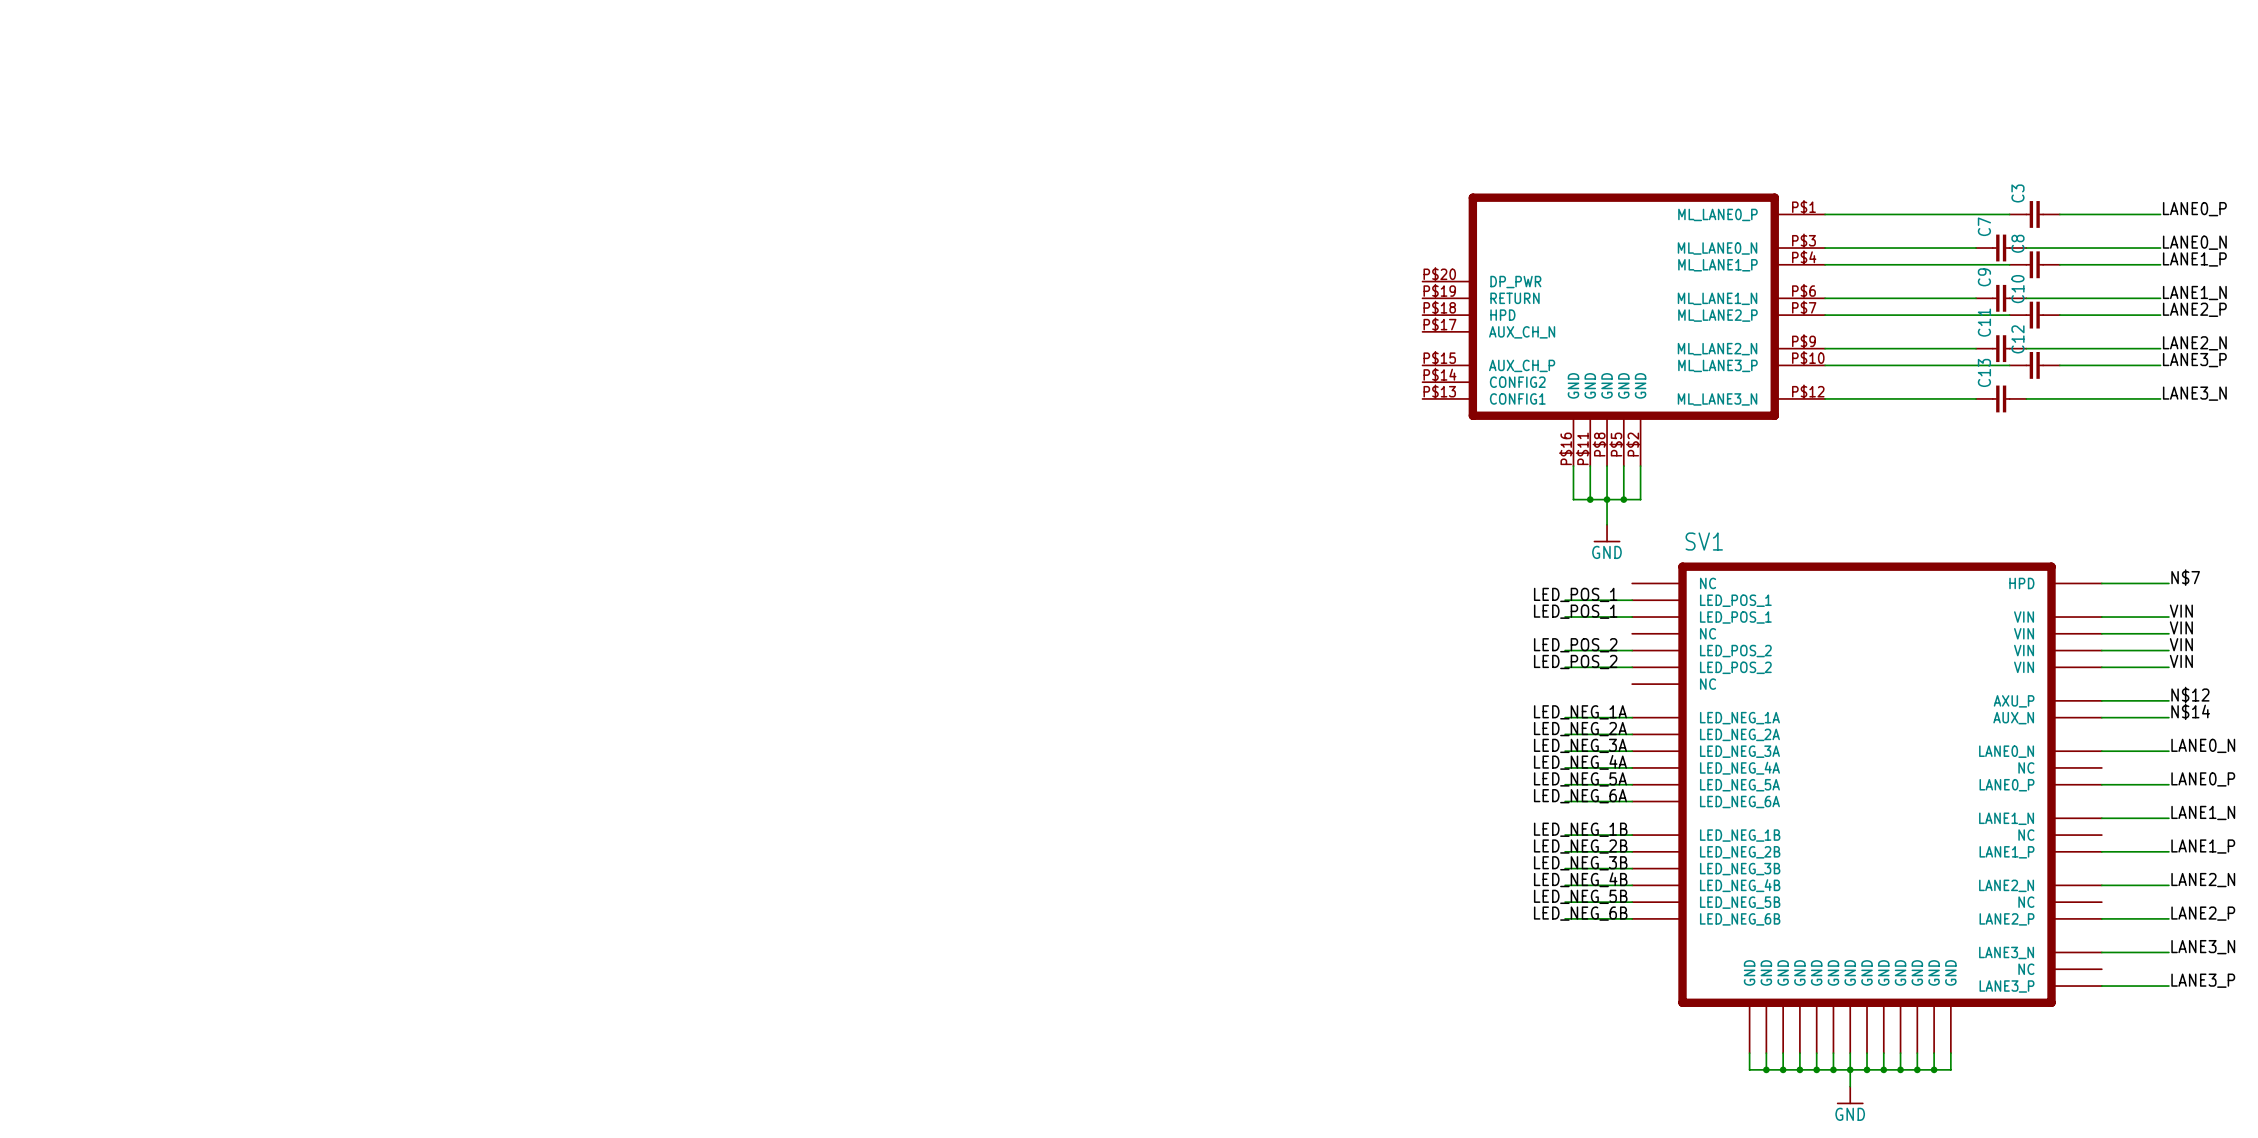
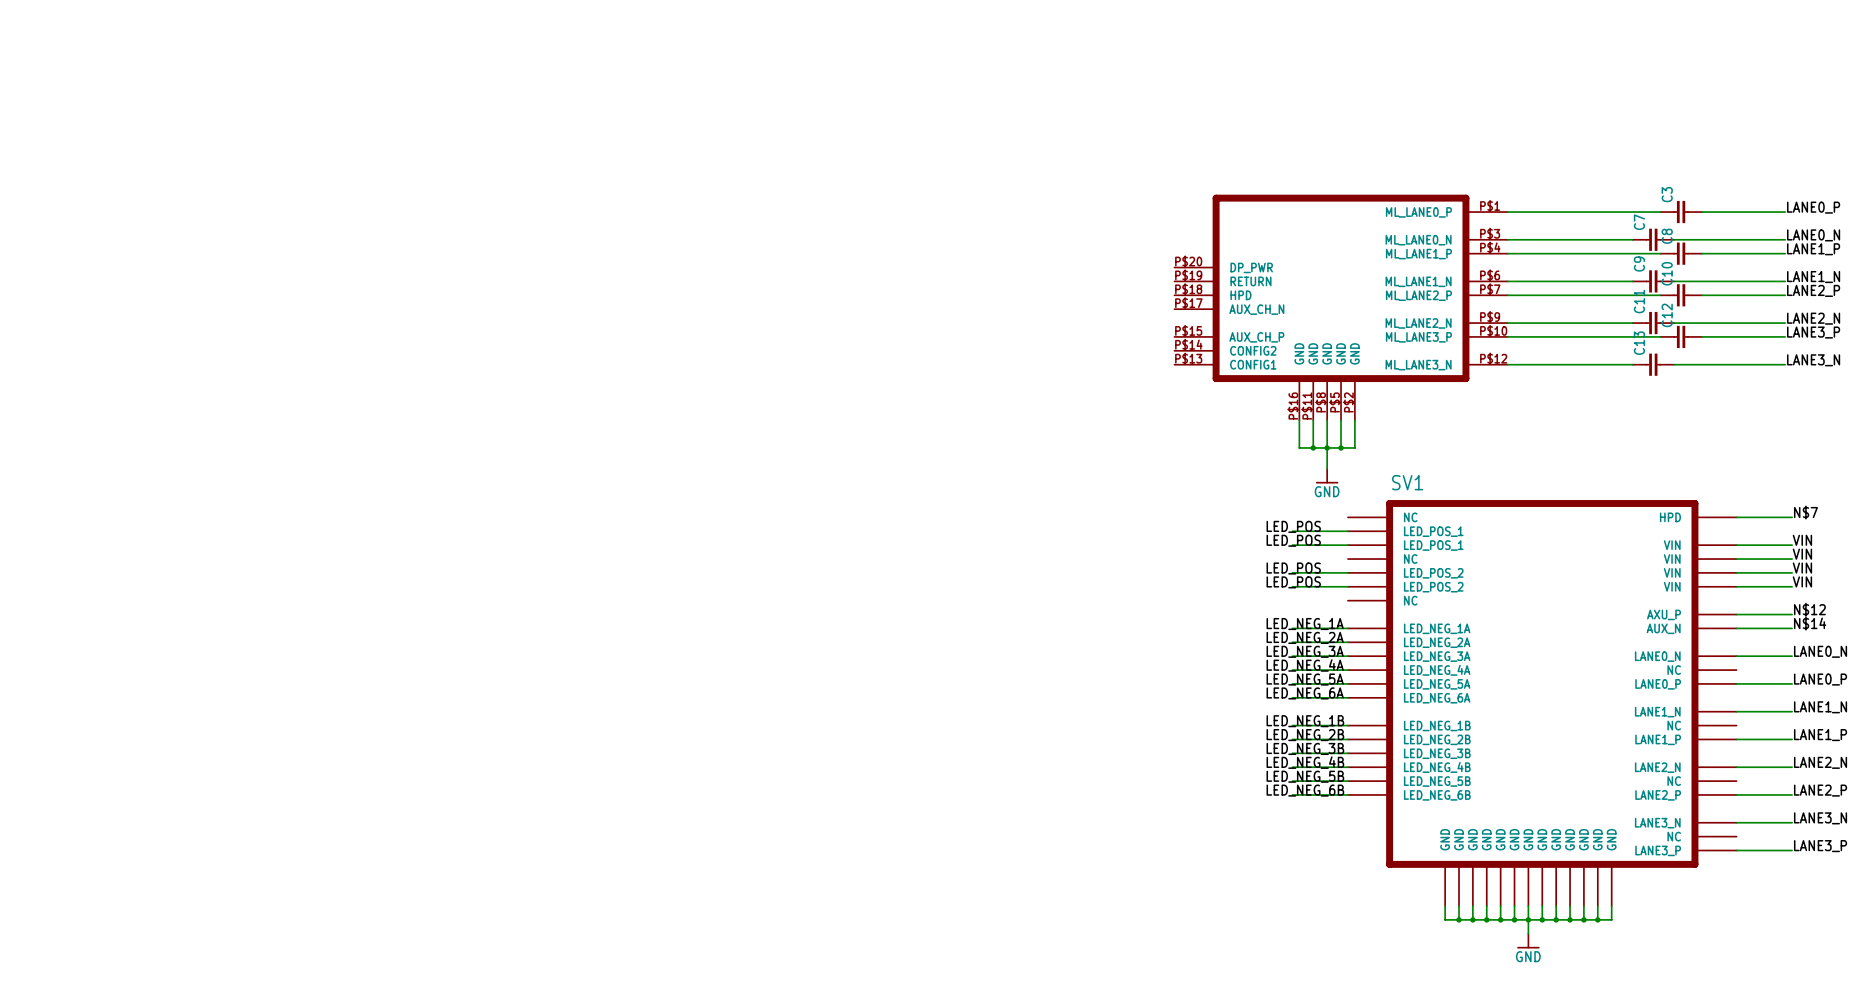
label: LED_POS_1 (1575, 594) -> LED_POS (1293, 526)
label: LED_POS_1 (1575, 611) -> LED_POS (1293, 540)
label: LED_POS_2 (1575, 645) -> LED_POS (1293, 568)
label: LED_POS_2 (1575, 662) -> LED_POS (1293, 582)

